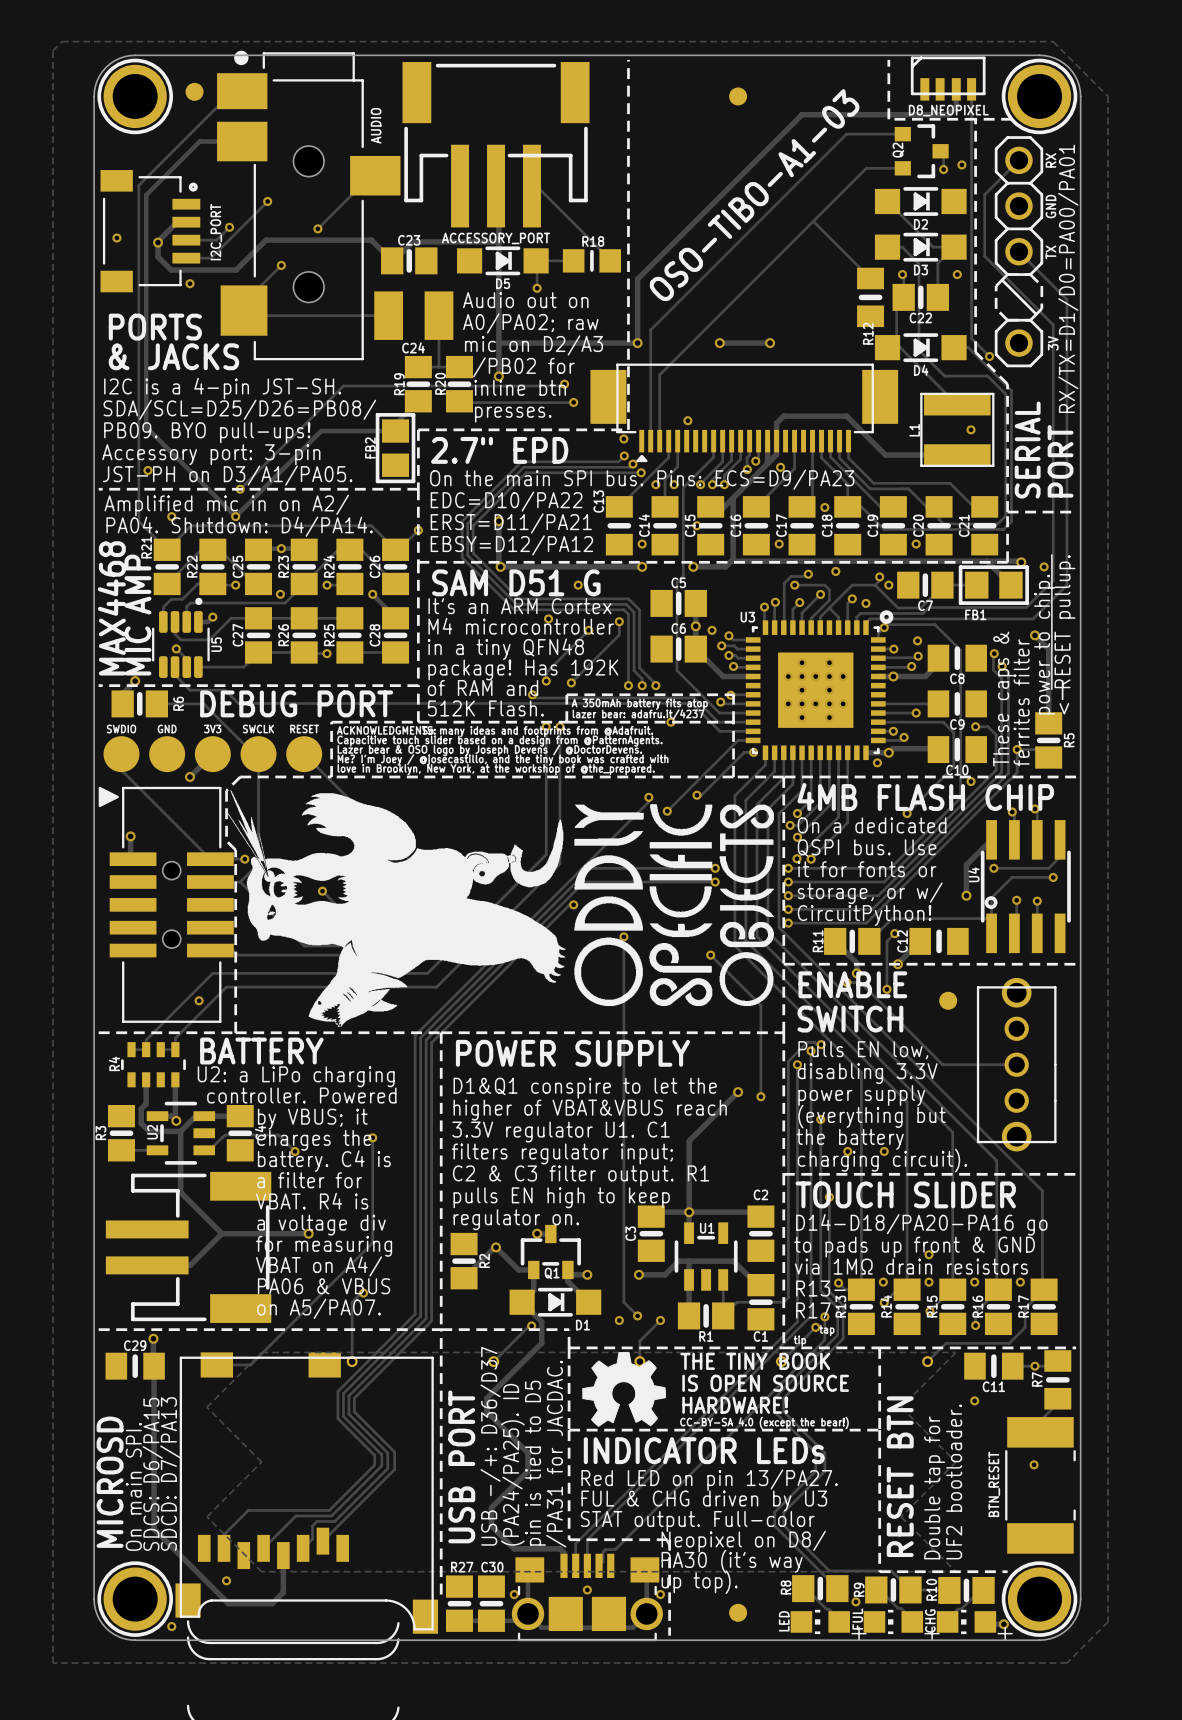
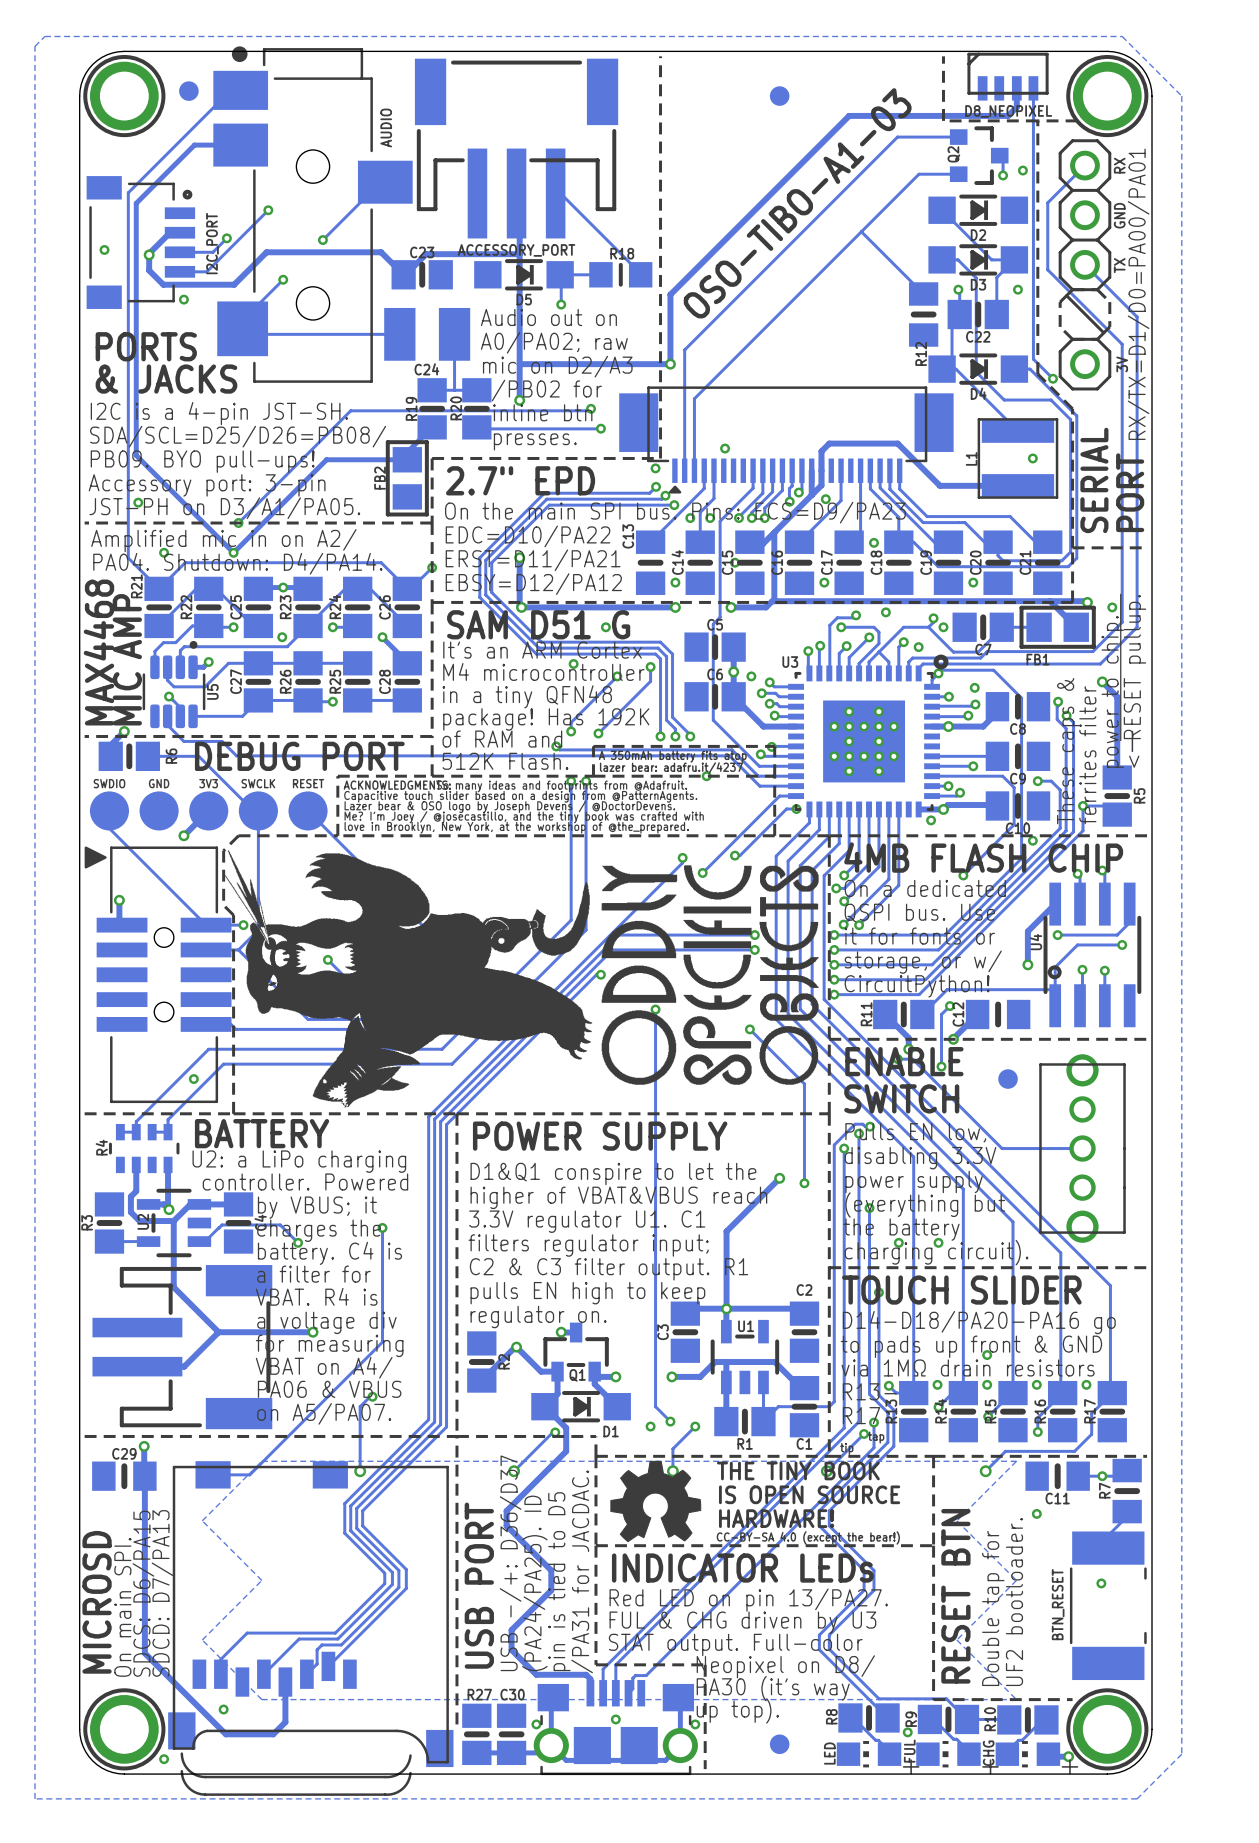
via: (719, 343) -> none
track: (770, 343) (719, 343) -> none
via: (770, 343) -> none

